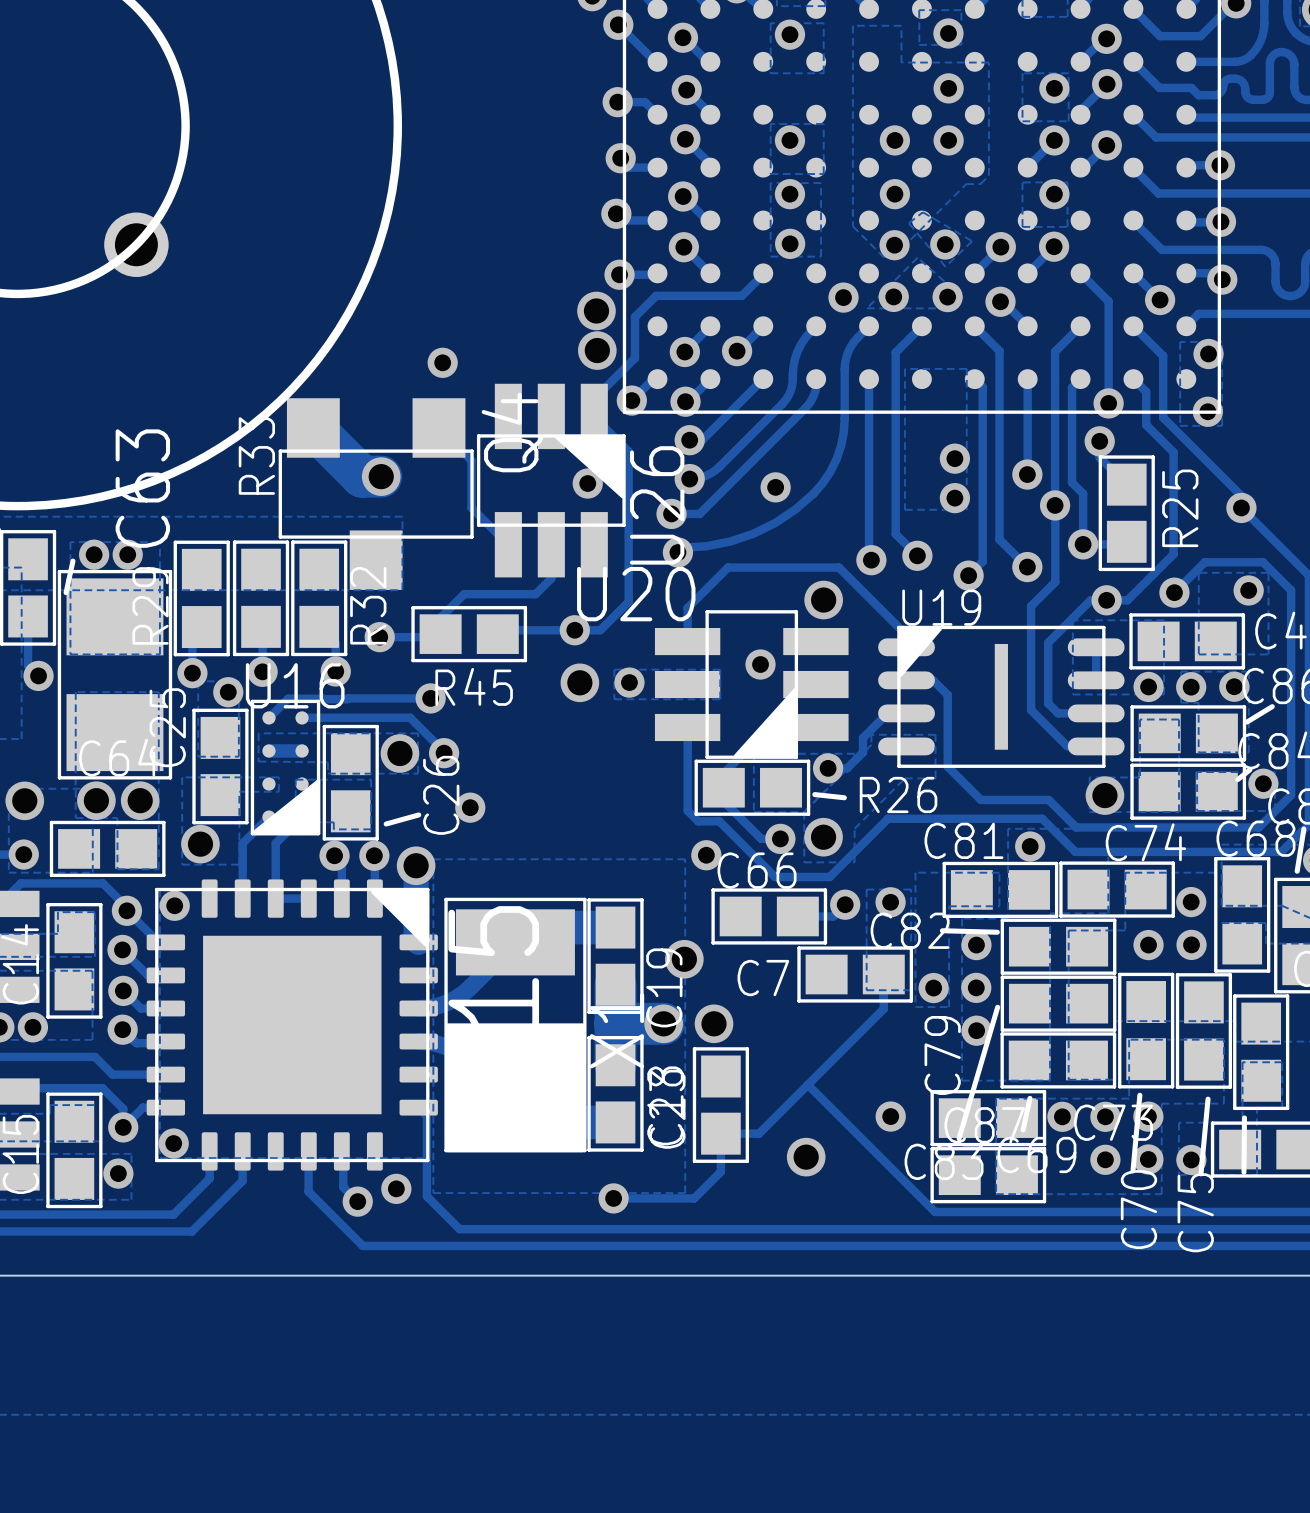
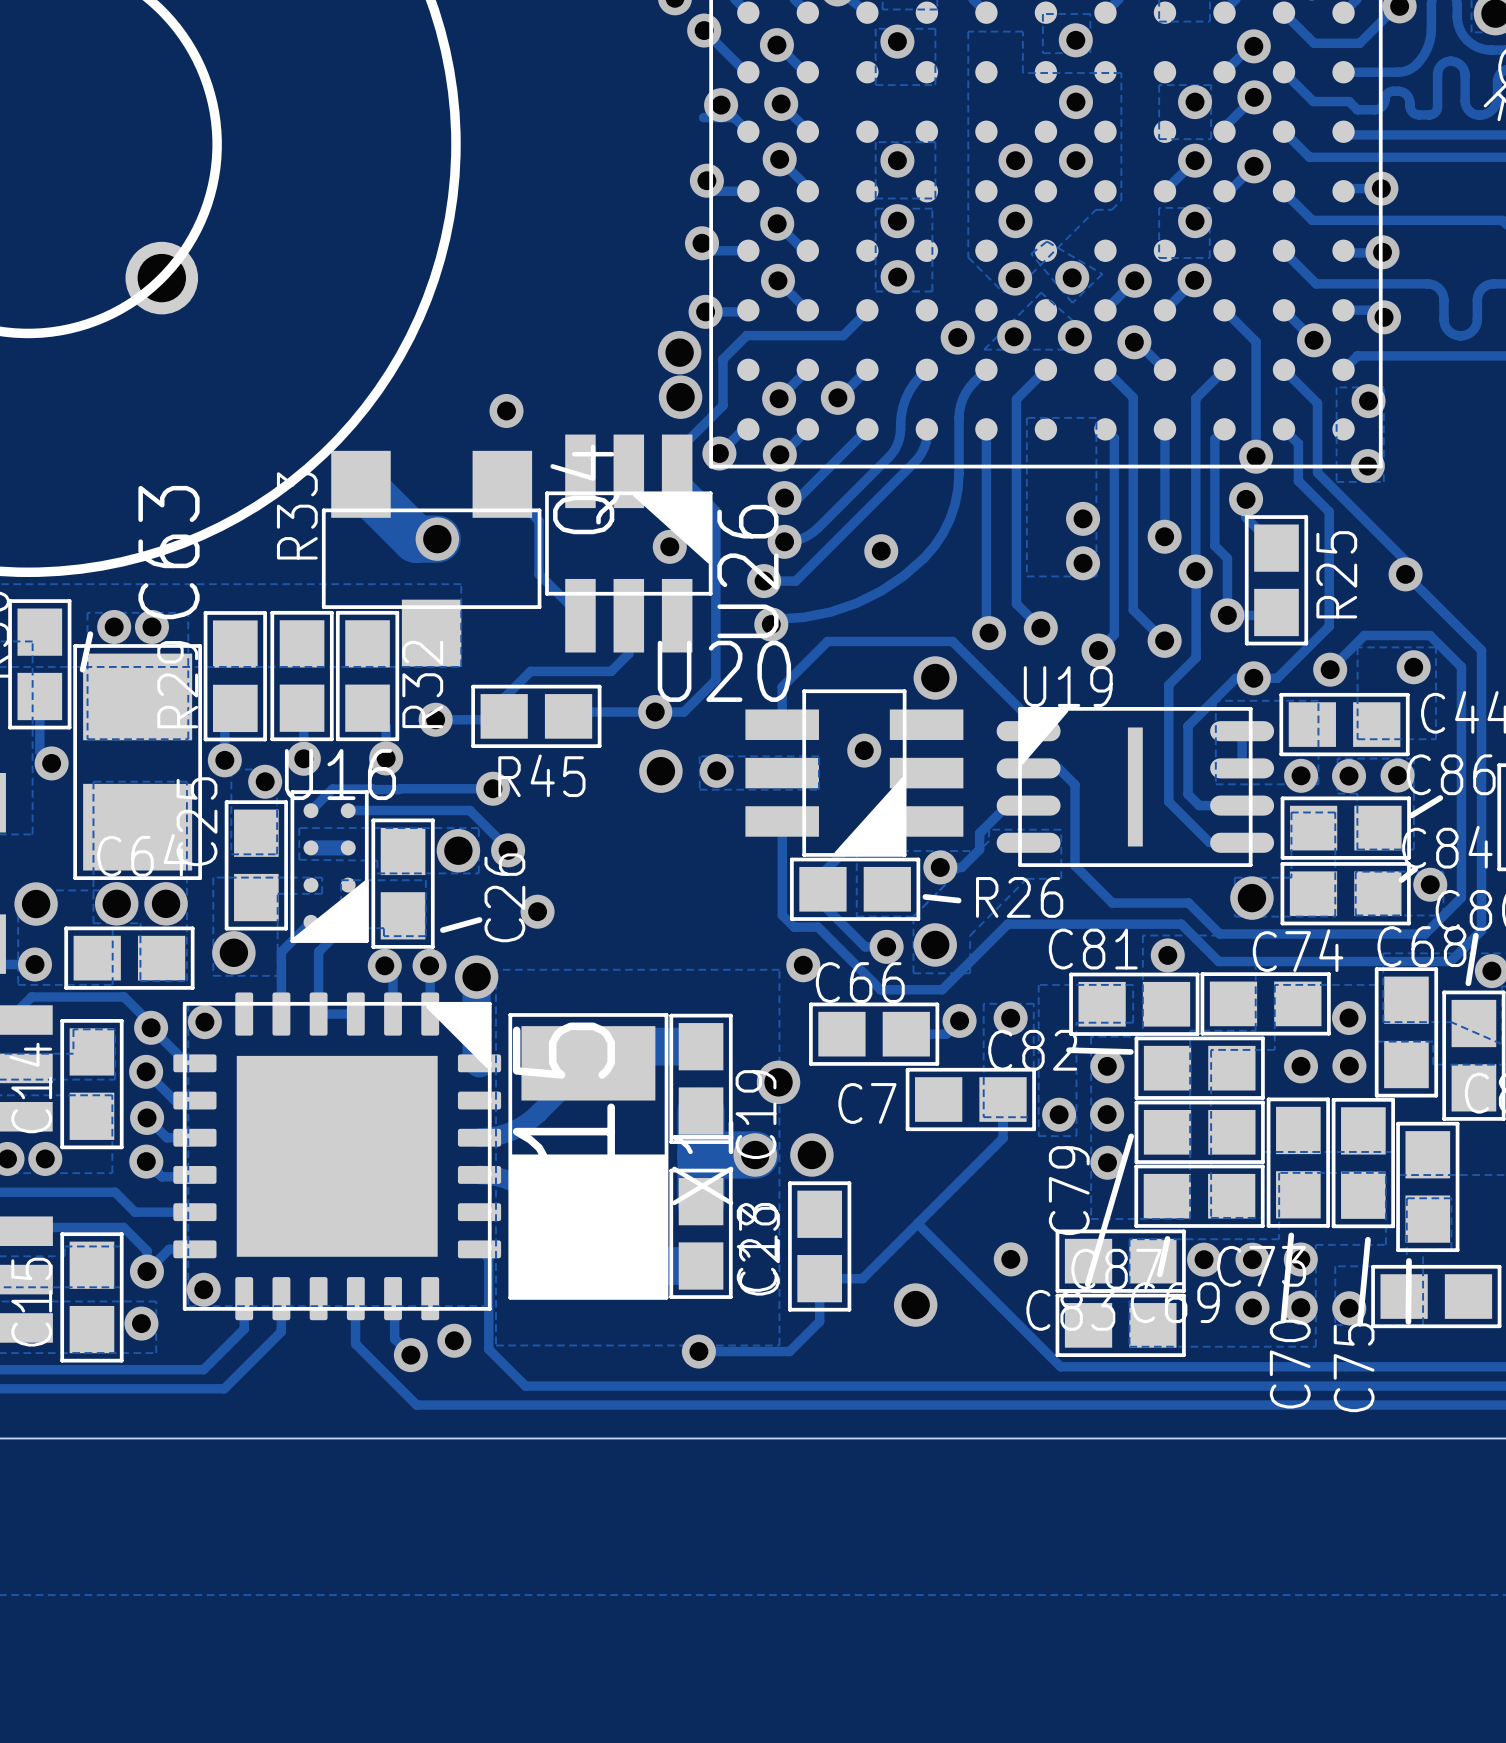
via position: (617, 102) -> (721, 105)

